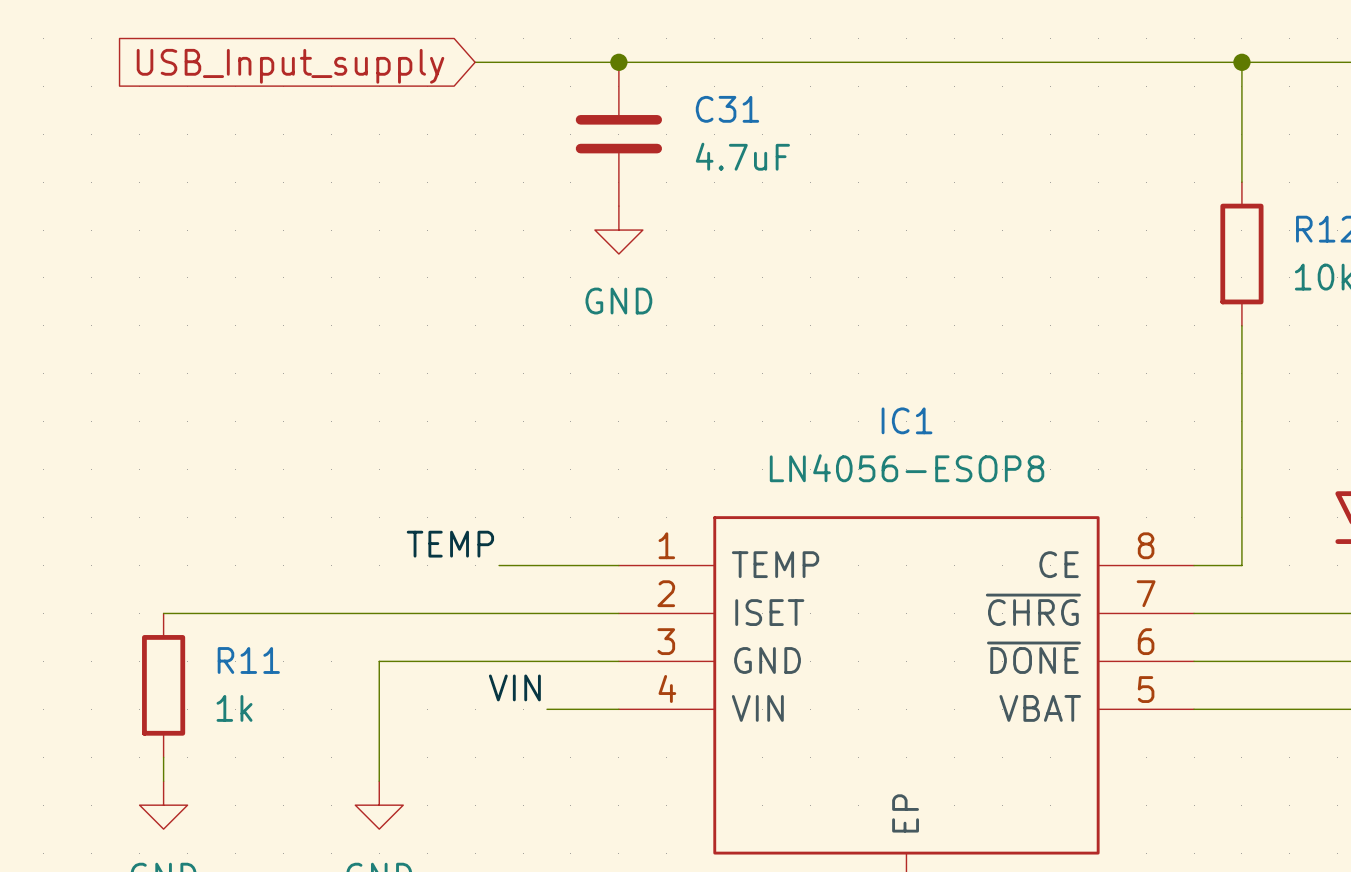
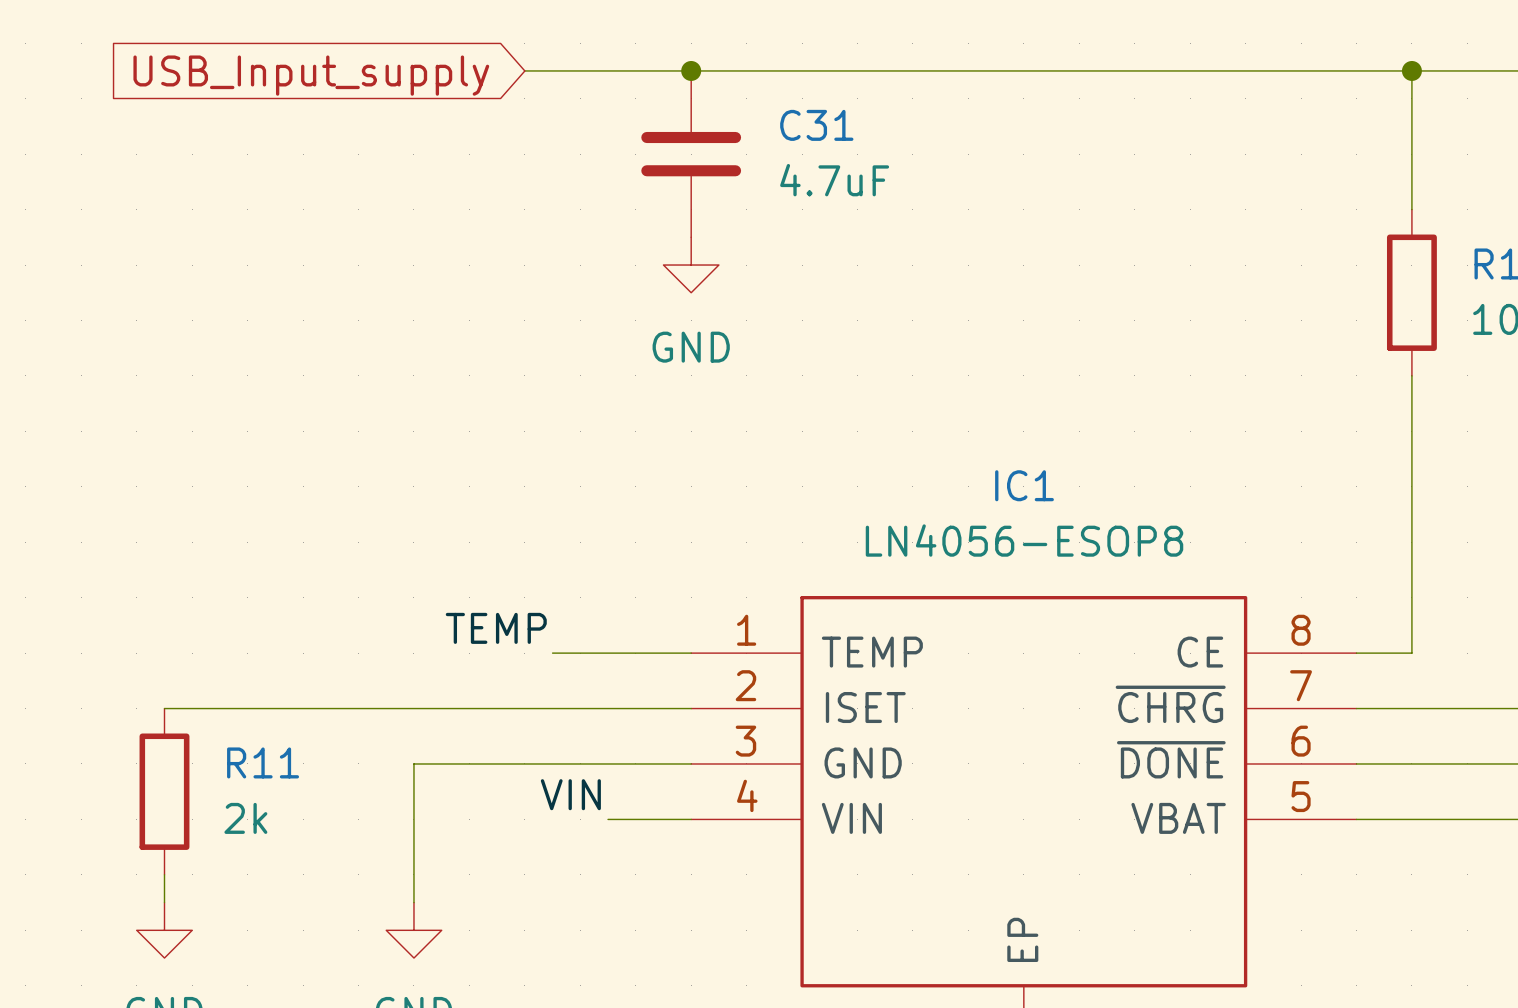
R11 value: 1k (234, 708) -> 2k (245, 818)

